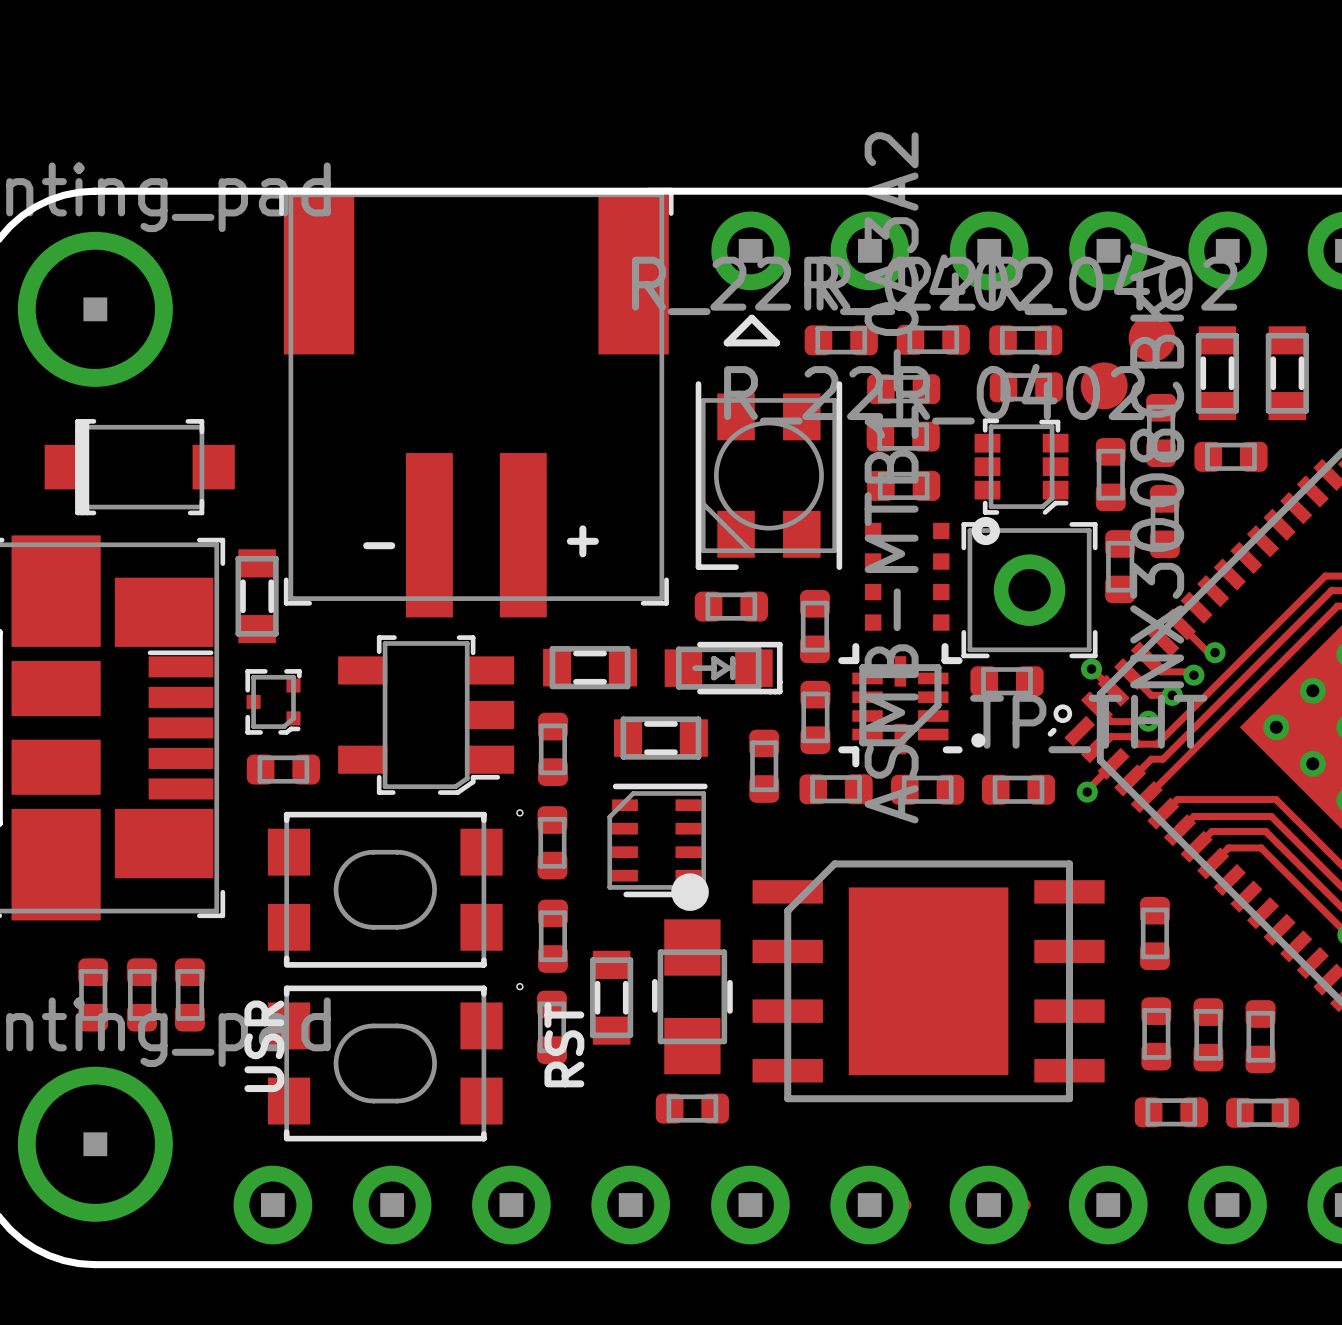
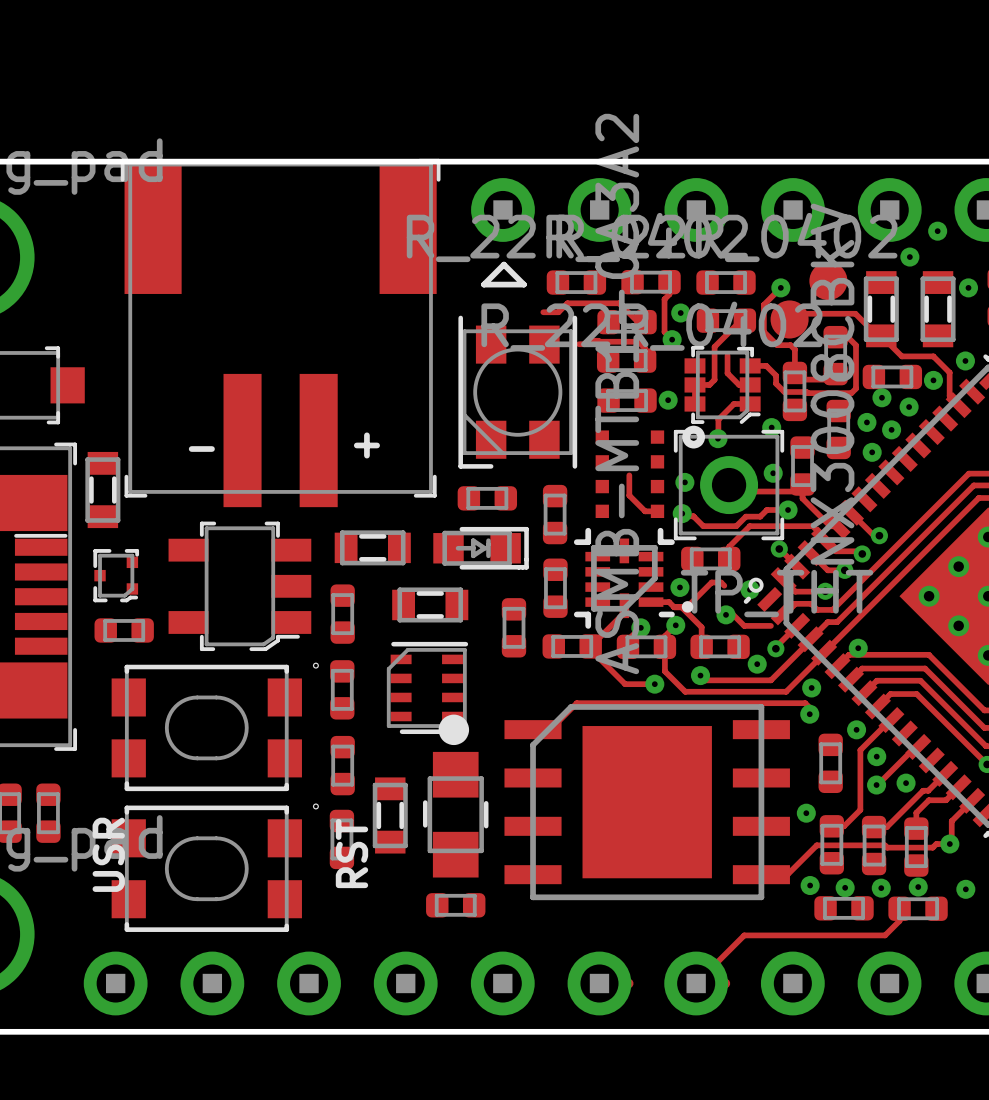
via: none -> (937, 231)
via: none -> (909, 257)
track: none -> (668, 280) (669, 294) (664, 299) (664, 332) (672, 339)
track: none -> (780, 287) (763, 304) (763, 331) (777, 345) (790, 345) (794, 349) (794, 372) (801, 379) (830, 379) (835, 374)
via: none -> (780, 287)
via: none -> (968, 287)
track: none -> (543, 312) (558, 312) (567, 303) (619, 303) (638, 322) (645, 322)
via: none -> (680, 313)
track: none -> (789, 319) (795, 313) (855, 313) (901, 356) (933, 356) (949, 372) (949, 396) (958, 405)
track: none -> (744, 320) (740, 320) (714, 346) (714, 379) (709, 384) (694, 384) (694, 403)
track: none -> (835, 337) (847, 337) (856, 345) (856, 388) (851, 393) (784, 391) (776, 383) (776, 375) (766, 365) (750, 365)
via: none -> (672, 339)
track: none -> (579, 344) (584, 344) (589, 340) (638, 341) (645, 348) (645, 360)
track: none -> (727, 355) (727, 373) (739, 384) (750, 384)
via: none -> (965, 360)
via: none -> (933, 380)
via: none -> (881, 397)
via: none -> (668, 400)
track: none -> (750, 403) (734, 403) (718, 419) (718, 438)
via: none -> (909, 407)
via: none -> (866, 422)
via: none -> (771, 427)
via: none -> (891, 429)
via: none -> (717, 438)
via: none -> (872, 452)
via: none -> (773, 473)
track: none -> (629, 475) (629, 495) (645, 511) (657, 511)
via: none -> (684, 482)
track: none -> (729, 485) (735, 491) (795, 491) (802, 484) (802, 498) (830, 526) (837, 526)
track: none -> (788, 510) (766, 510) (760, 516) (745, 516) (736, 526) (703, 526) (693, 516) (690, 516)
via: none -> (788, 510)
via: none -> (682, 513)
track: none -> (824, 539) (812, 526) (749, 526) (729, 546) (729, 558)
track: none -> (724, 585) (721, 582) (711, 582) (686, 607) (674, 607) (669, 602) (651, 602)
via: none -> (679, 587)
via: none -> (749, 589)
track: none -> (624, 605) (624, 612) (590, 646) (590, 649) (625, 684) (654, 684)
track: none -> (681, 607) (701, 627) (701, 646)
track: none -> (727, 609) (744, 625) (770, 625)
via: none -> (726, 614)
track: none -> (675, 625) (664, 636) (664, 671) (685, 691) (786, 691) (824, 652)
via: none -> (675, 625)
via: none -> (640, 627)
track: none -> (810, 639) (770, 680) (705, 680) (700, 675)
via: none -> (858, 648)
via: none -> (757, 664)
via: none -> (700, 675)
via: none -> (654, 684)
via: none -> (811, 687)
track: none -> (812, 710) (805, 703) (576, 703) (550, 729) (533, 729) (530, 731)
via: none -> (809, 714)
track: none -> (891, 720) (860, 750) (860, 809) (844, 826) (831, 826)
via: none -> (856, 729)
track: none -> (918, 746) (915, 746) (876, 785)
via: none -> (876, 756)
track: none -> (945, 773) (928, 790) (923, 790) (886, 827) (874, 827)
via: none -> (906, 783)
via: none -> (876, 785)
track: none -> (958, 787) (946, 800) (928, 800) (916, 812) (916, 828)
track: none -> (972, 800) (951, 821) (951, 842) (949, 844) (936, 844) (932, 847) (816, 845) (787, 874) (761, 874)
via: none -> (806, 813)
via: none -> (949, 844)
via: none -> (810, 885)
via: none -> (845, 887)
via: none -> (918, 887)
via: none -> (881, 888)
via: none -> (965, 889)
track: none -> (899, 908) (899, 920) (885, 935) (744, 935) (696, 983)

